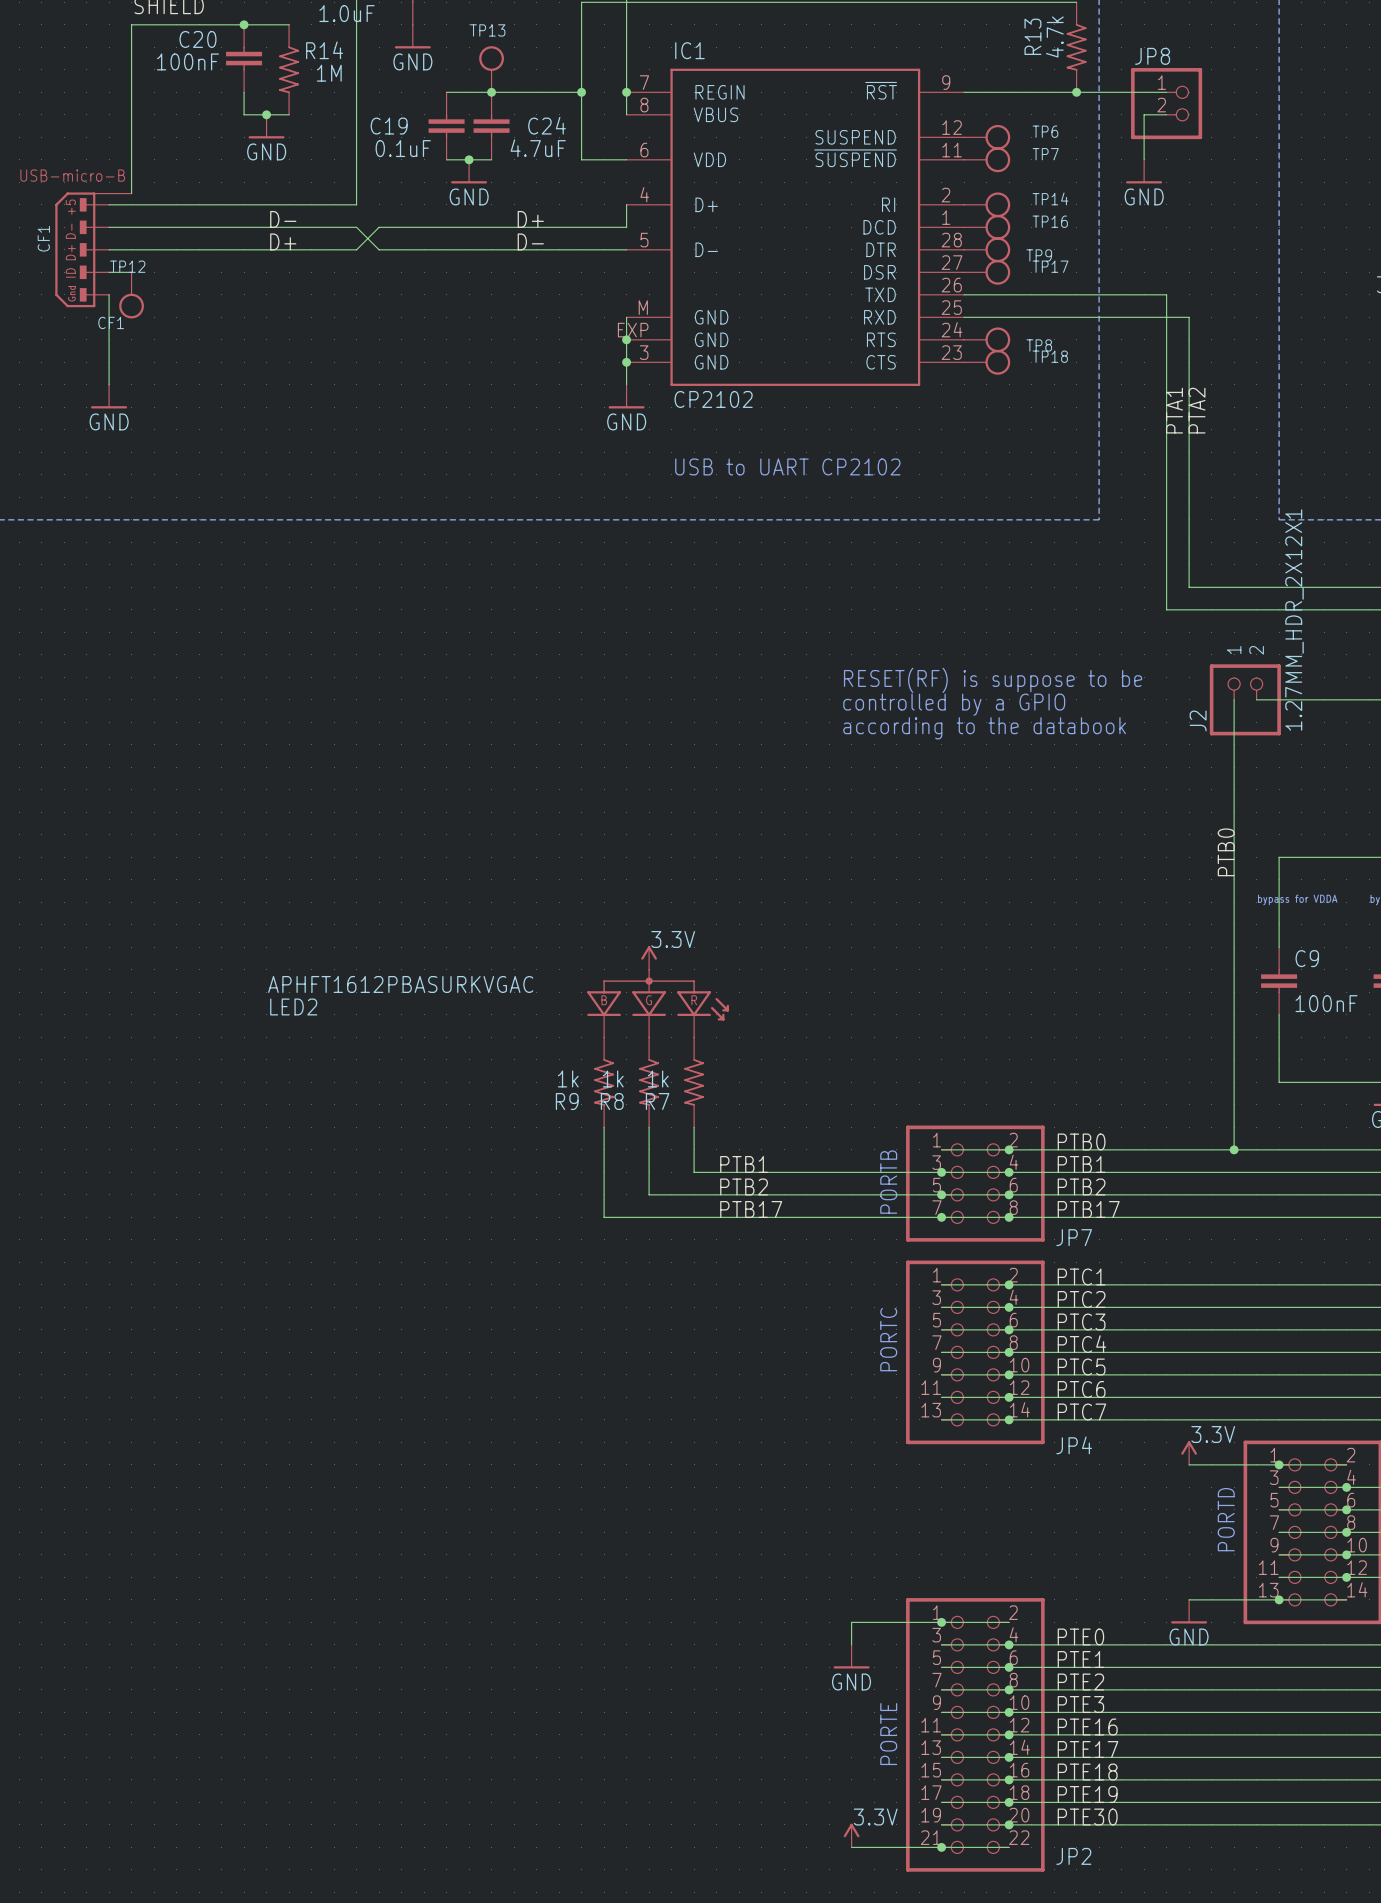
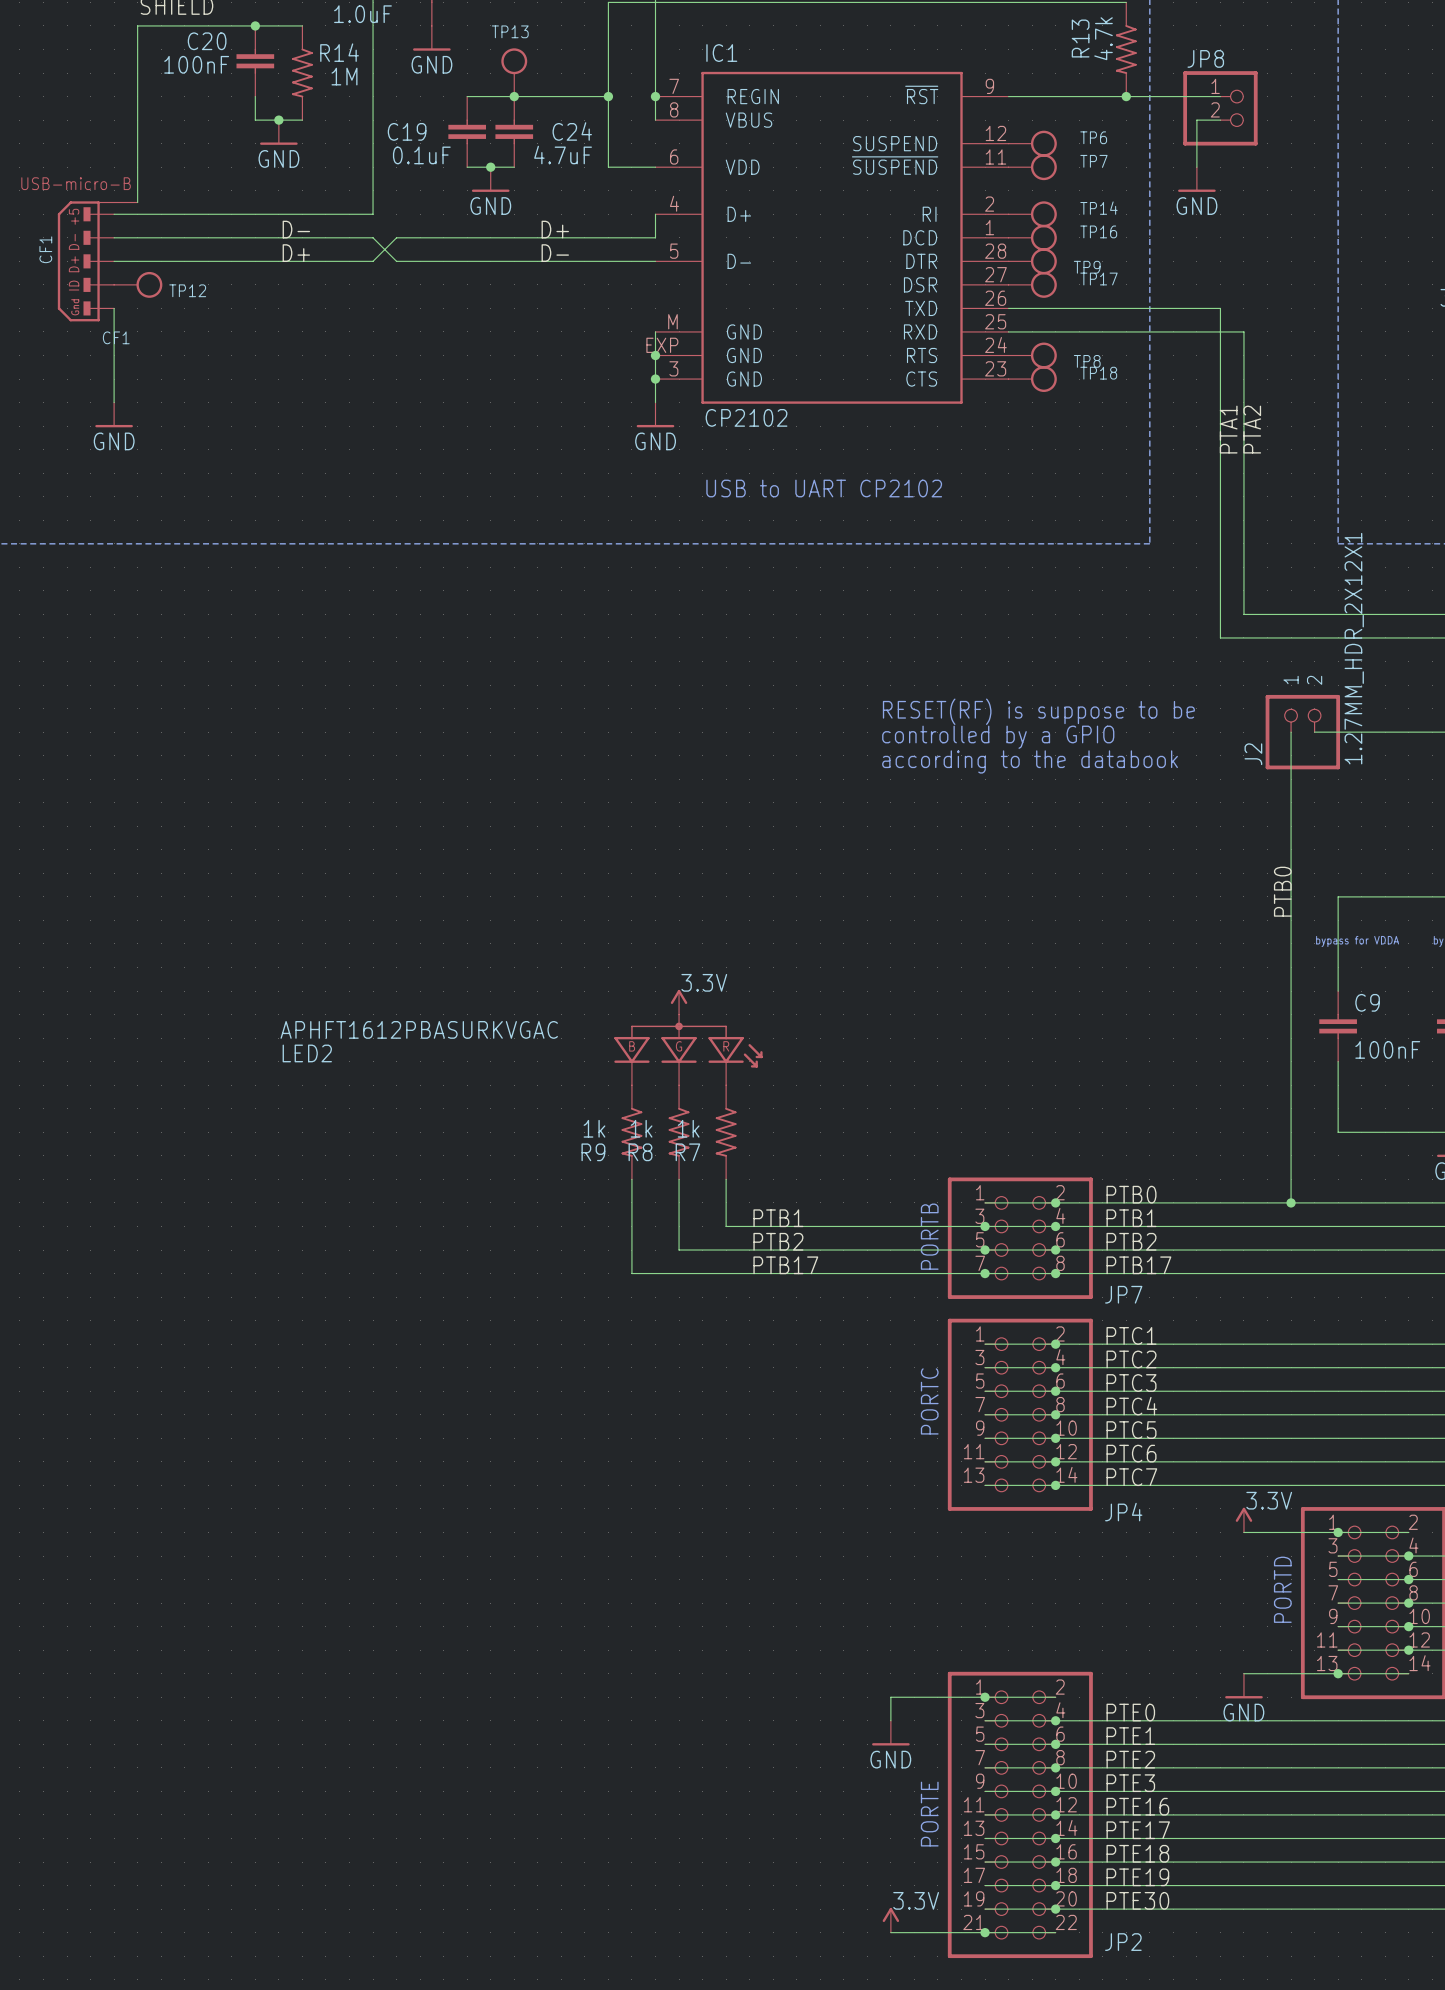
TP12 name position: TP12 (127, 266) -> TP12 (187, 290)
TP12 rotation: 0° (131, 306) -> 90° counterclockwise (149, 284)

